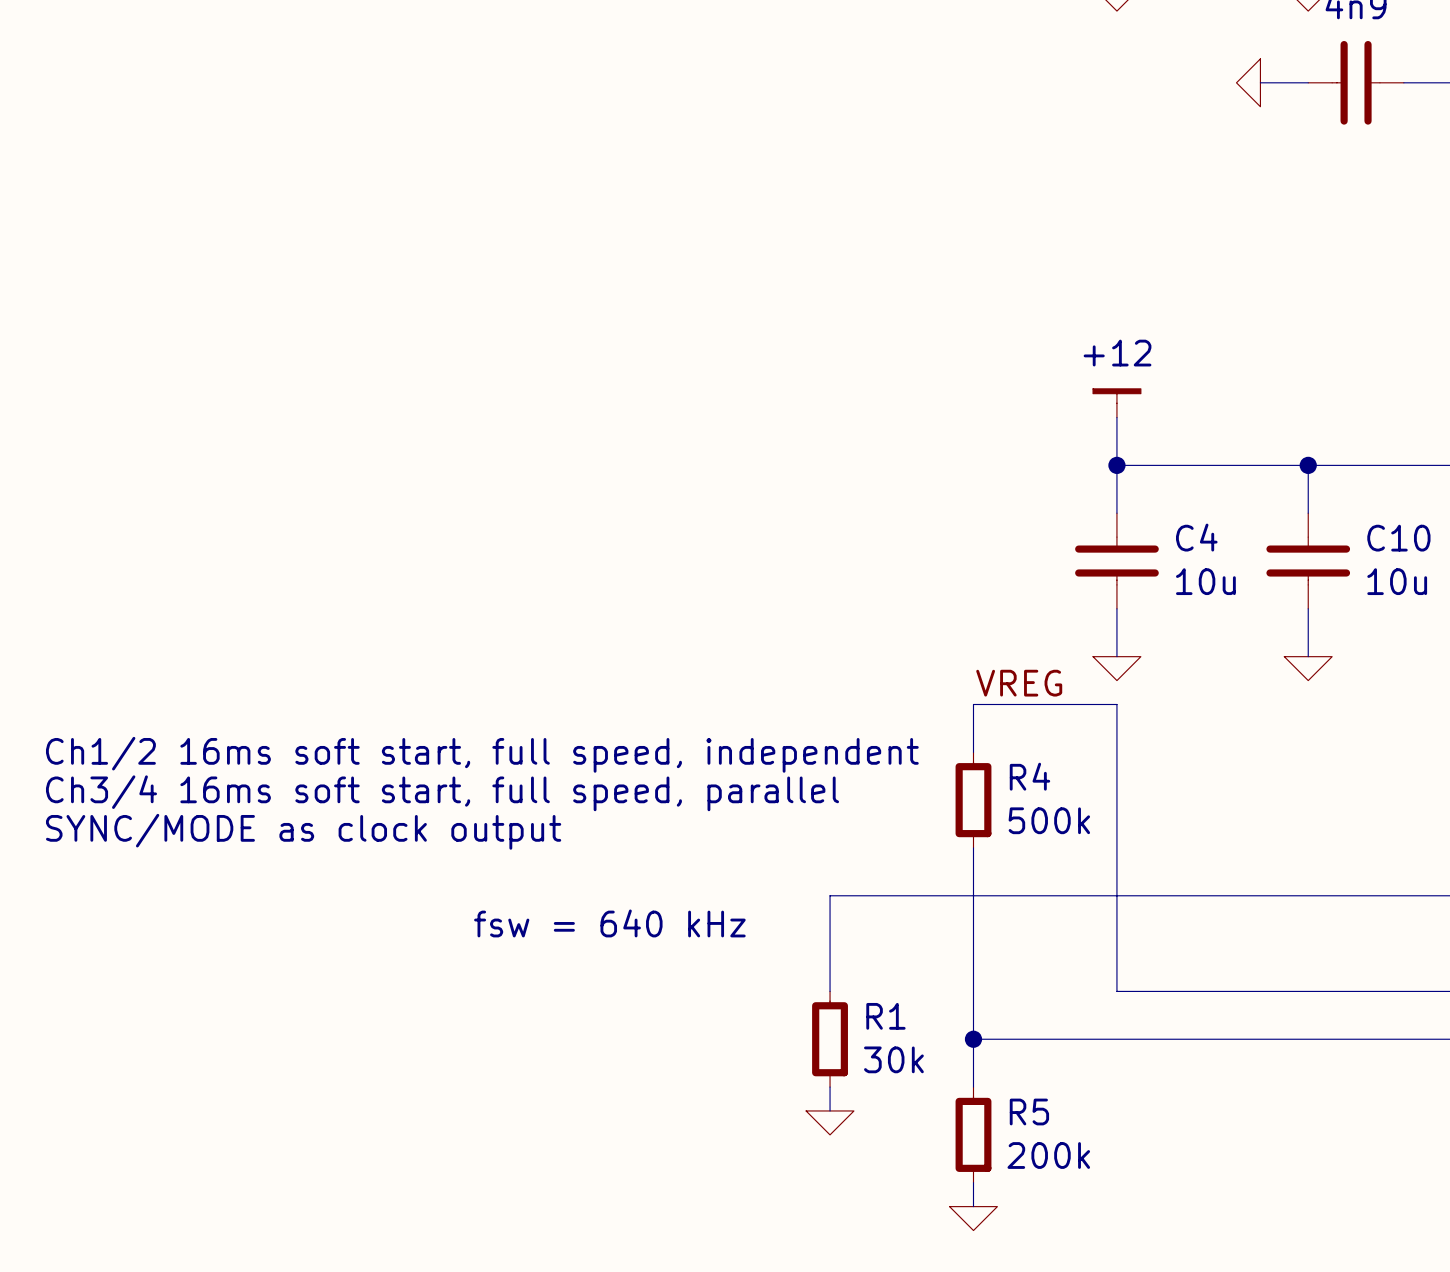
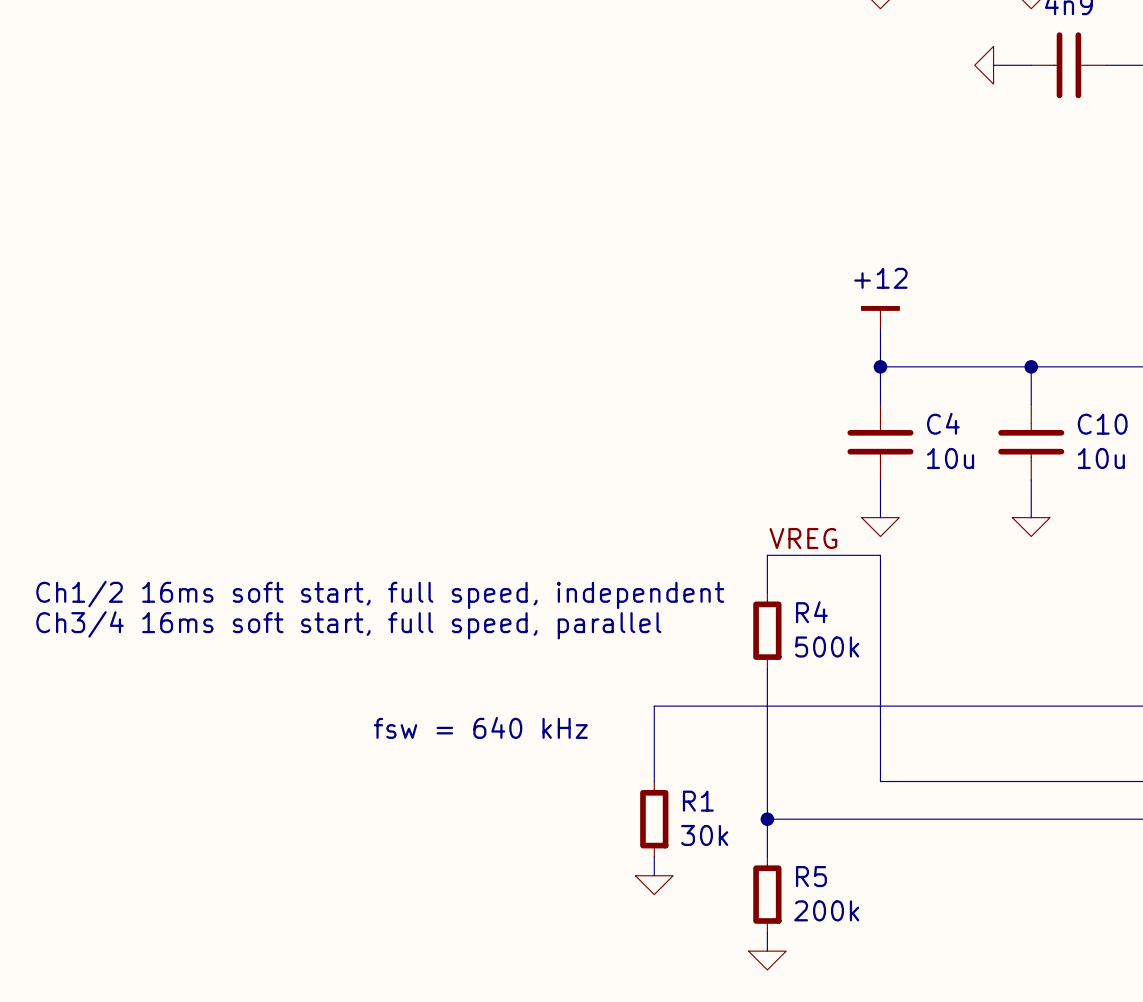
text: SYNC/MODE as clock output (303, 831) -> none

